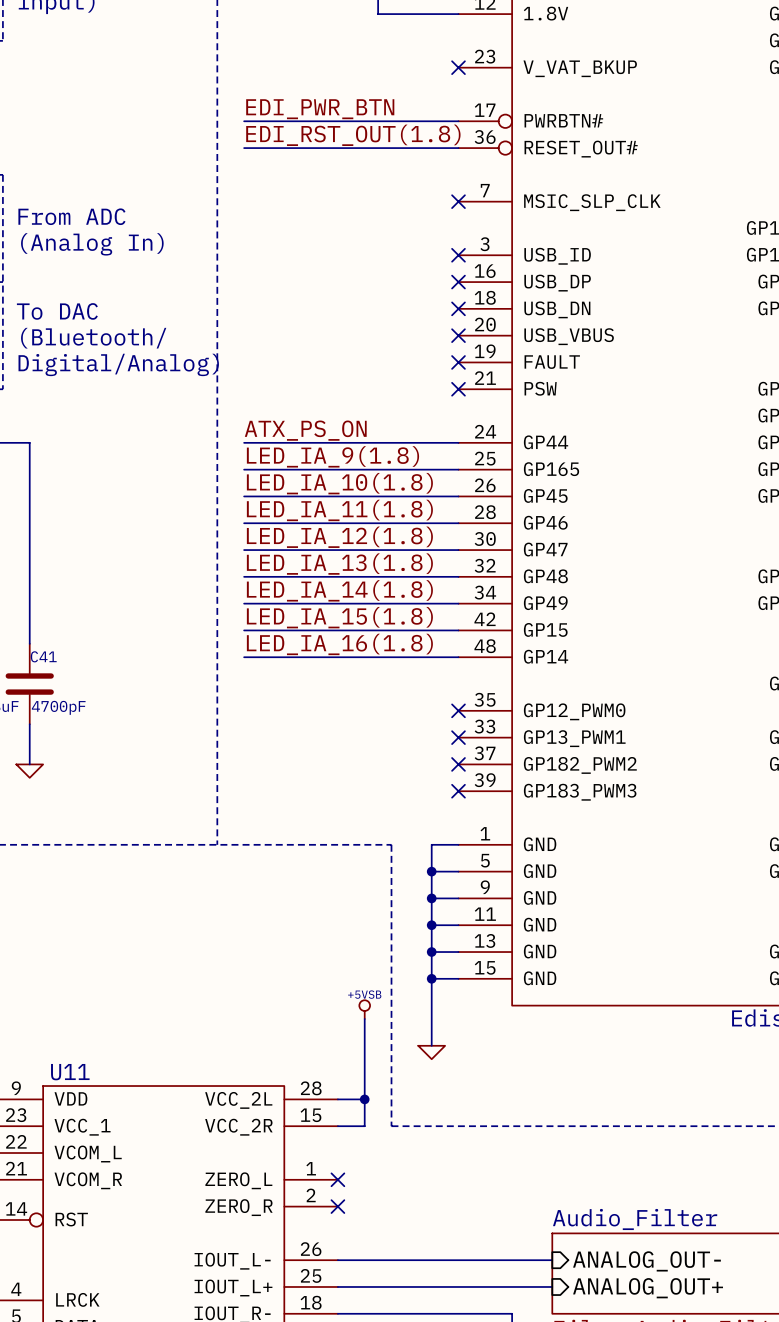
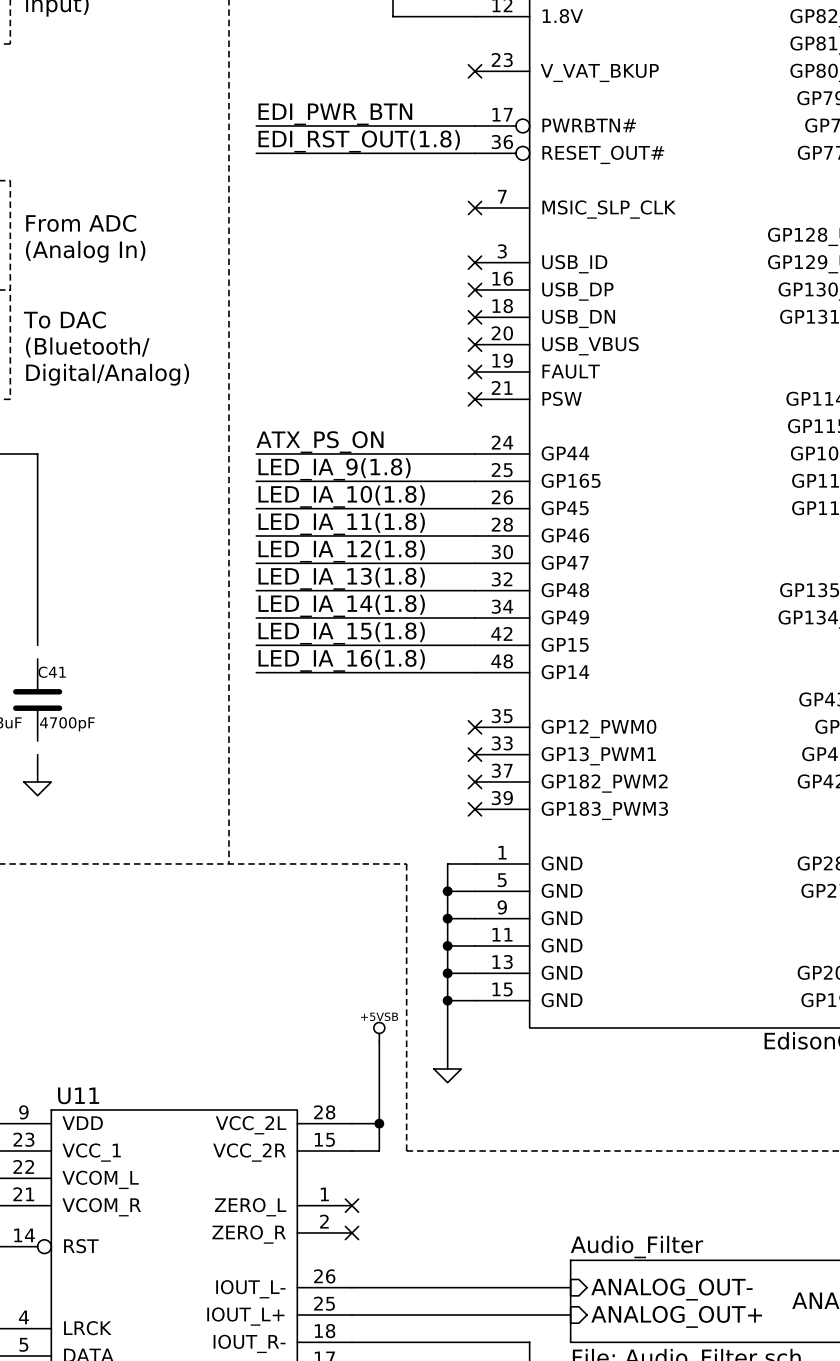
wire: (29, 630) (29, 643) -> none
wire: (29, 724) (29, 737) -> none

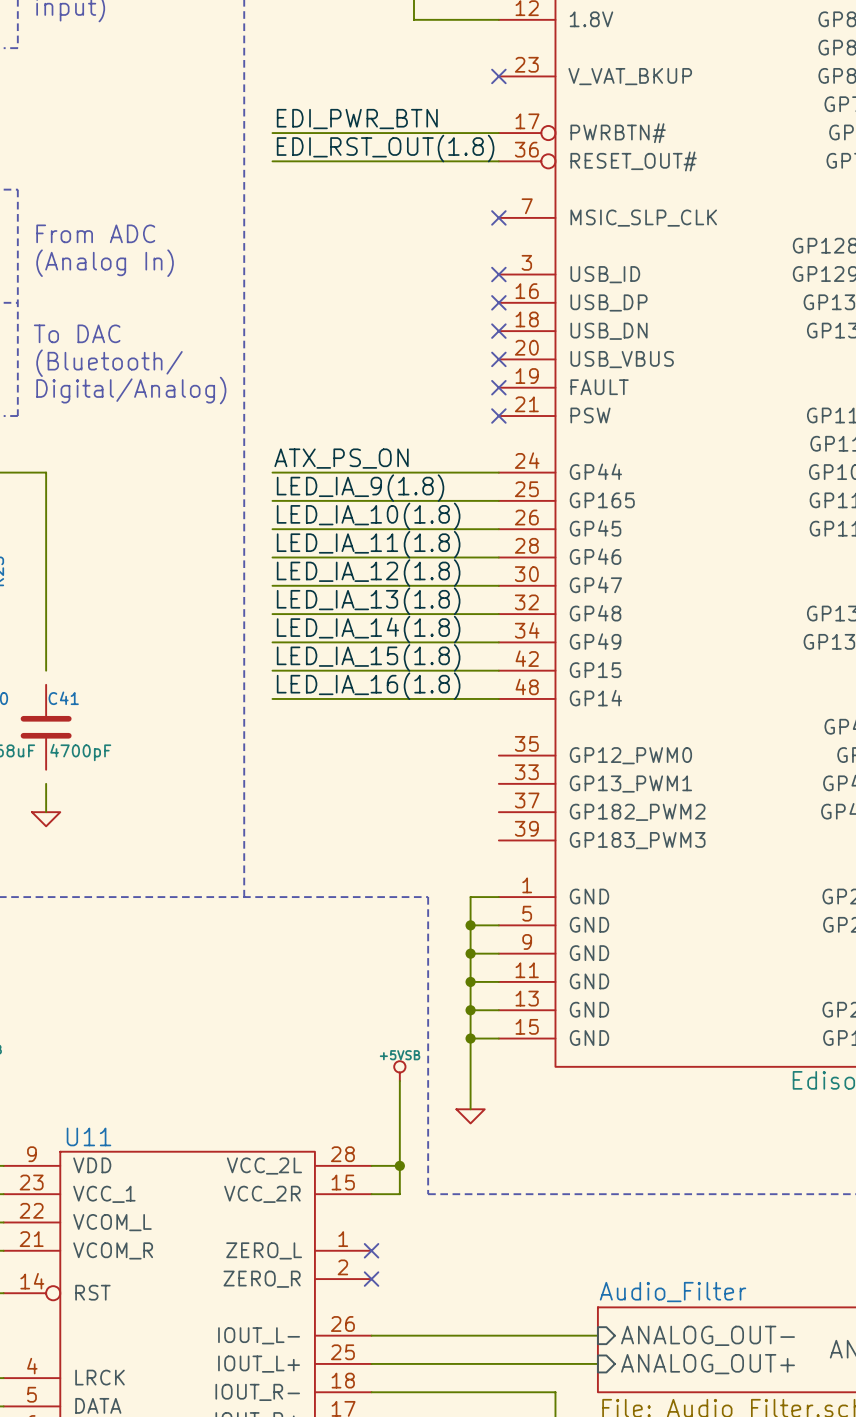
no-connect mark: (474, 727) -> none
no-connect mark: (474, 754) -> none
no-connect mark: (474, 781) -> none
no-connect mark: (474, 809) -> none

